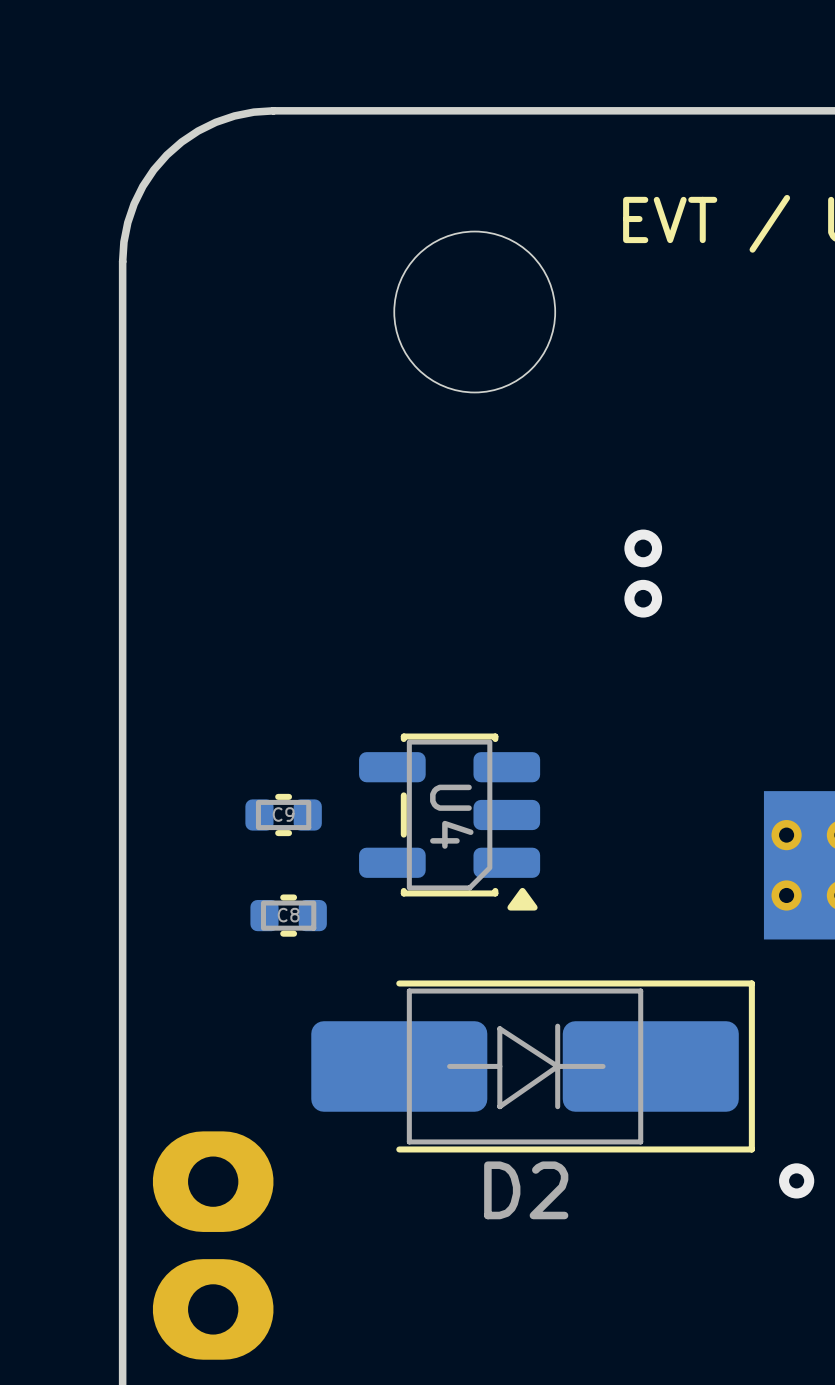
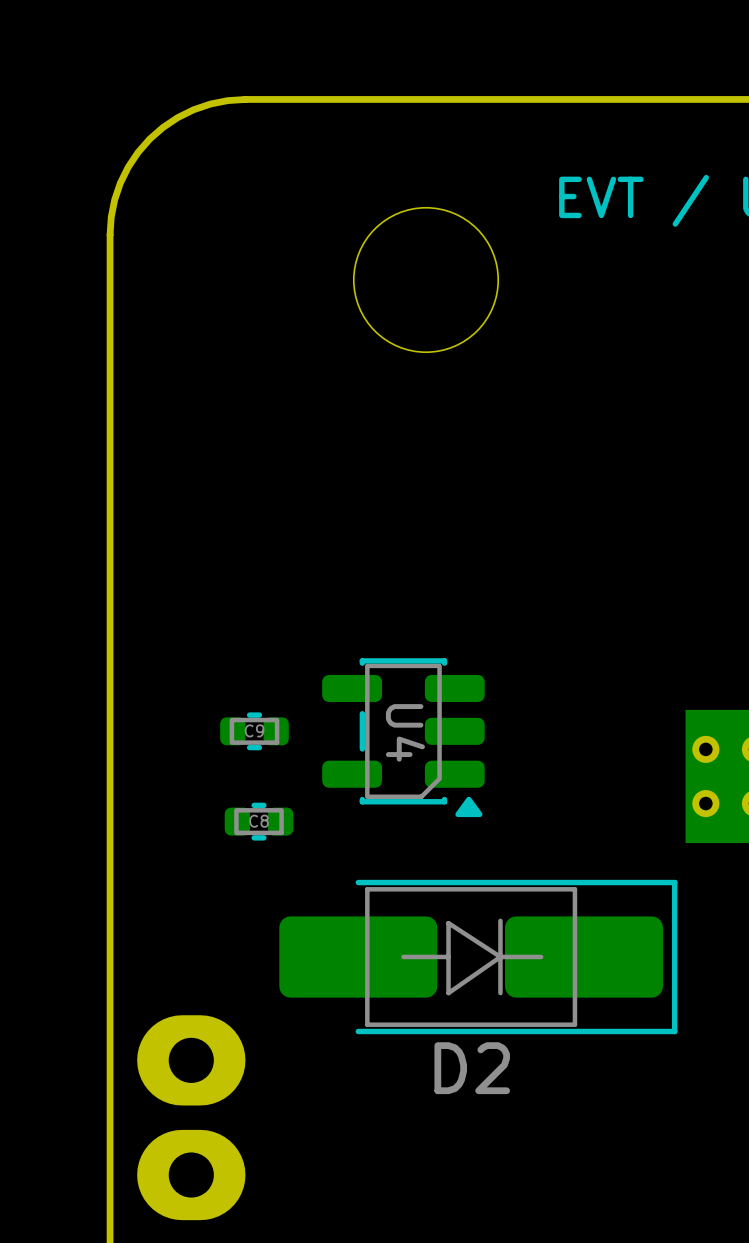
via: (643, 548) -> none
via: (643, 598) -> none
via: (796, 1180) -> none

